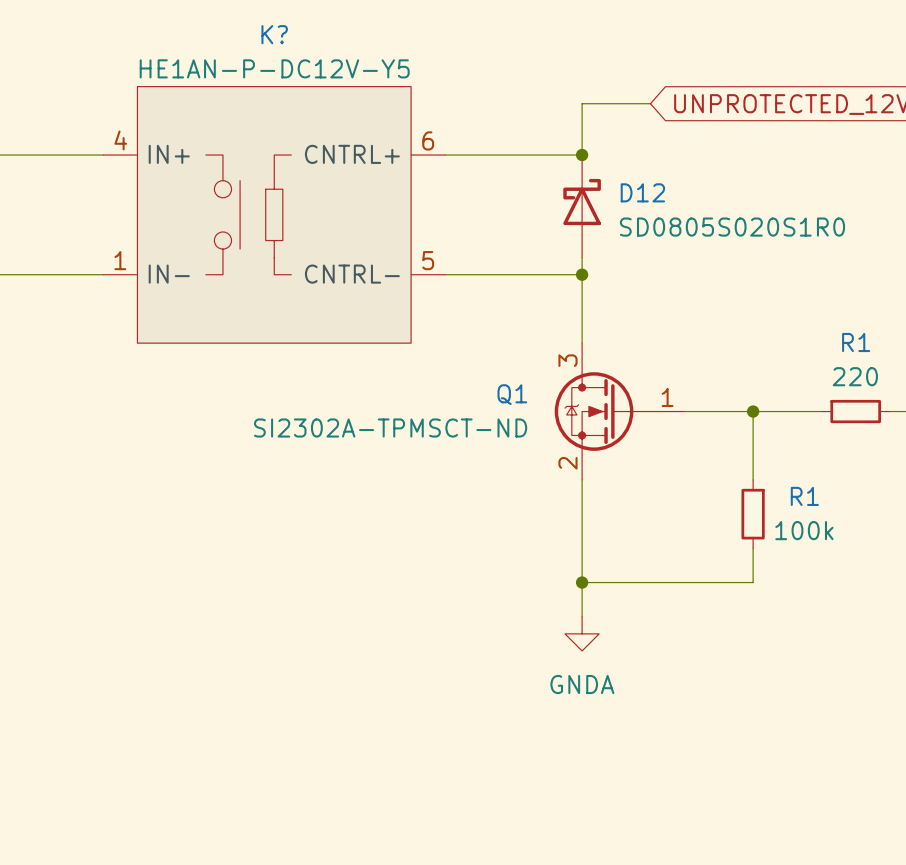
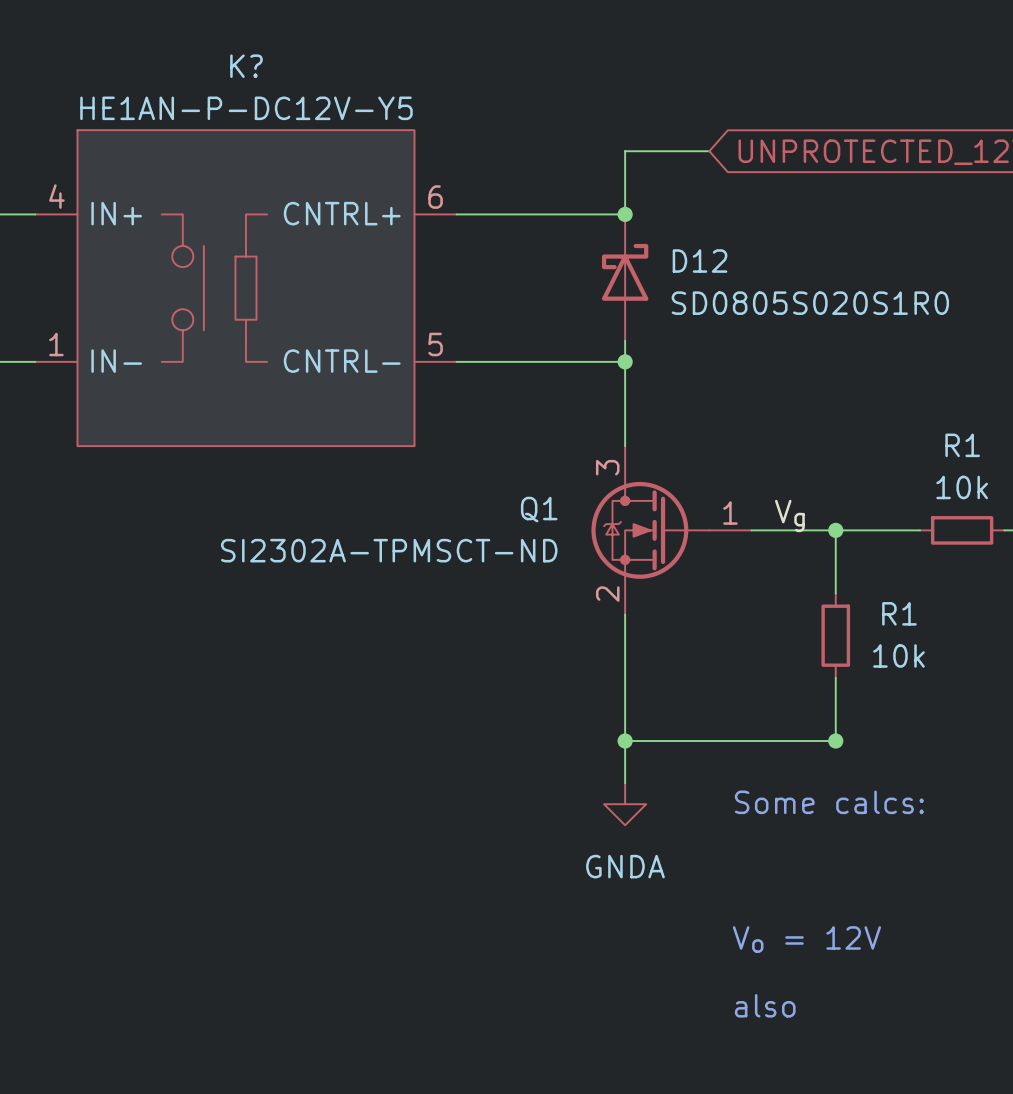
R1 value: 220 (855, 376) -> 10k (962, 487)
label: none -> Vg (789, 515)
R1: none -> 10k (835, 635)
R1: 100k (753, 514) -> none
junction: none -> (835, 741)
text: none -> Some calcs: (829, 802)
text: none -> Vo = 12V (806, 939)
text: none -> also (765, 1005)

